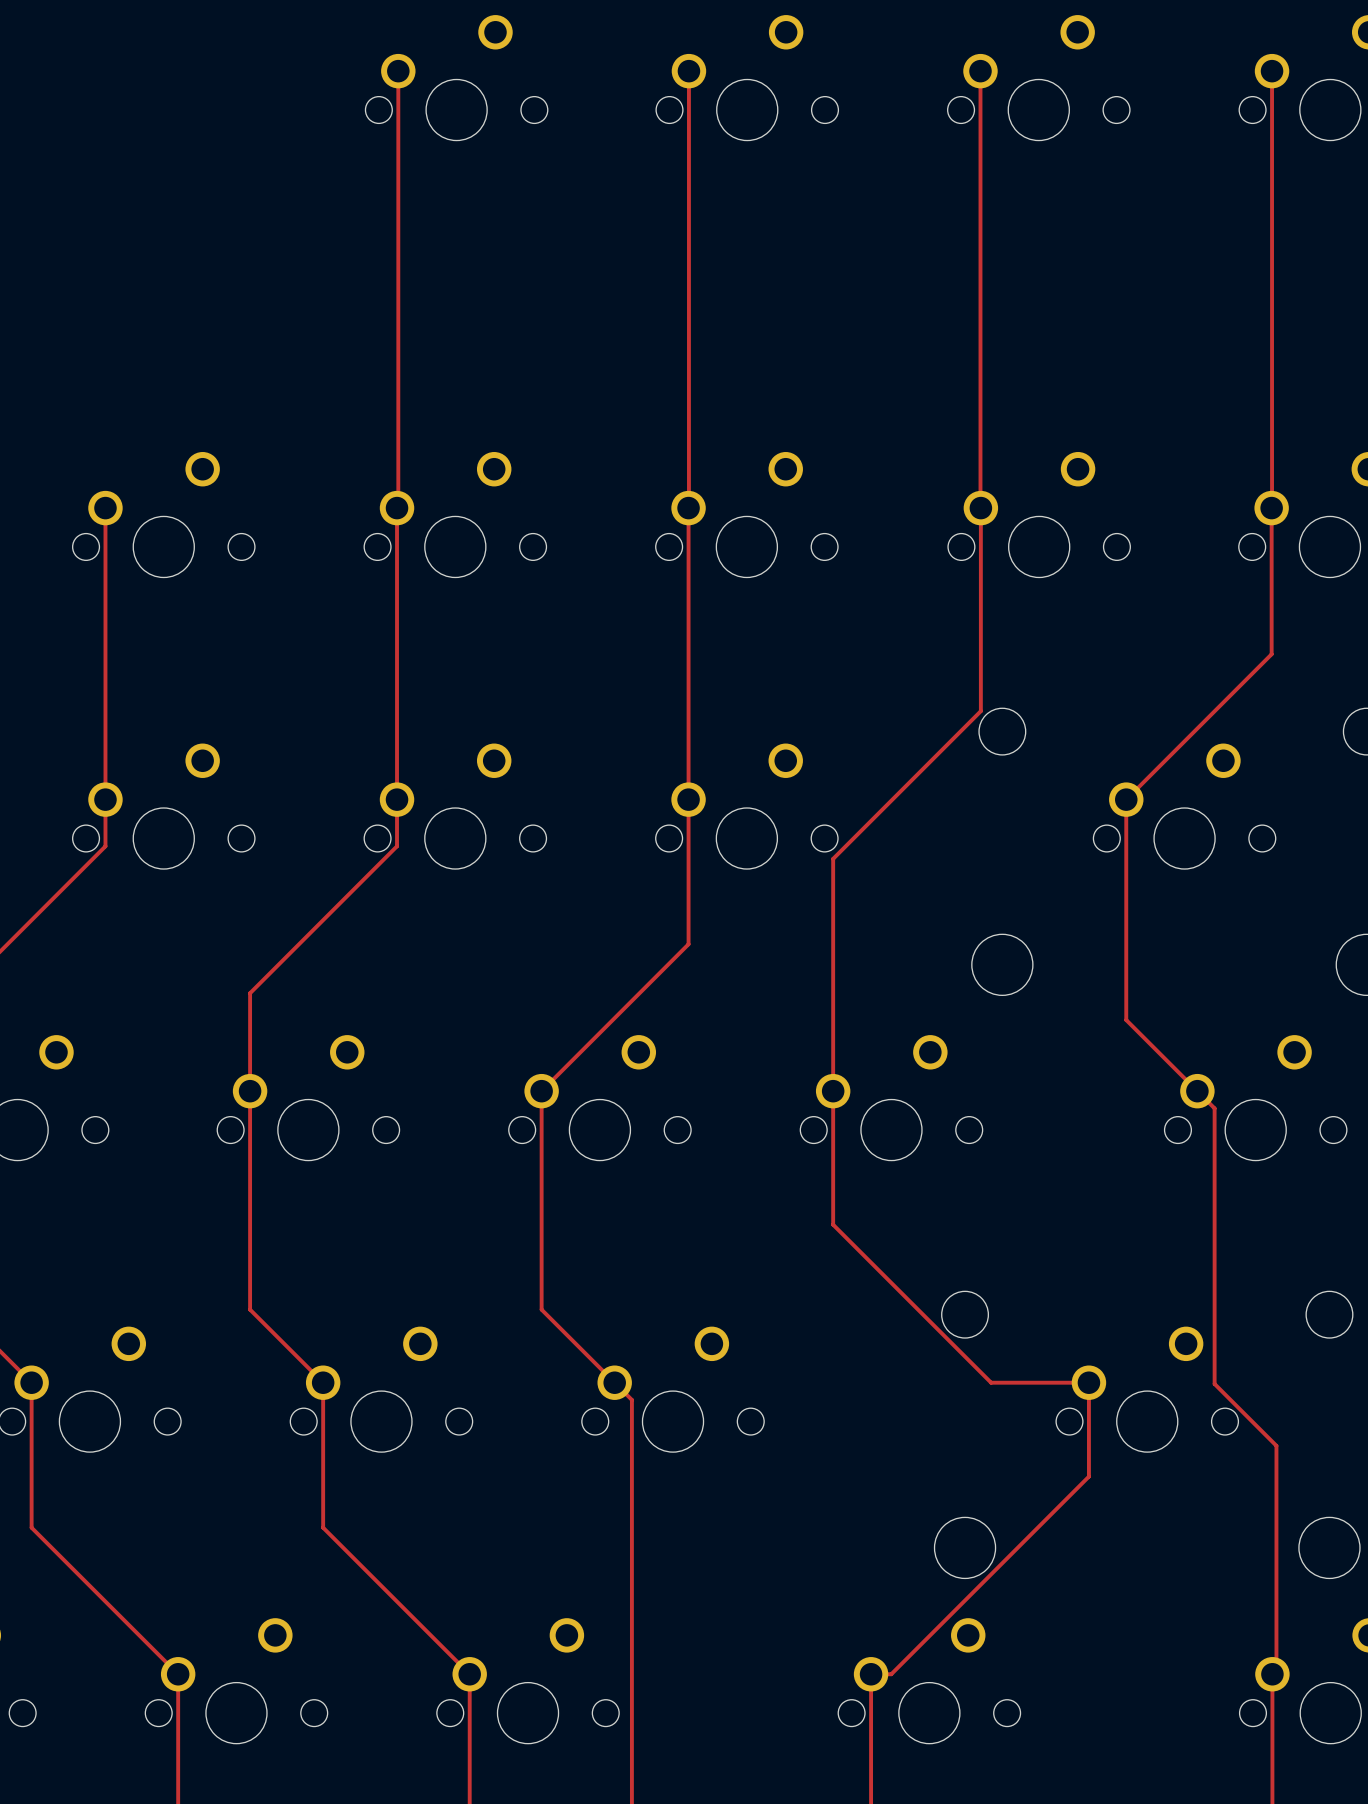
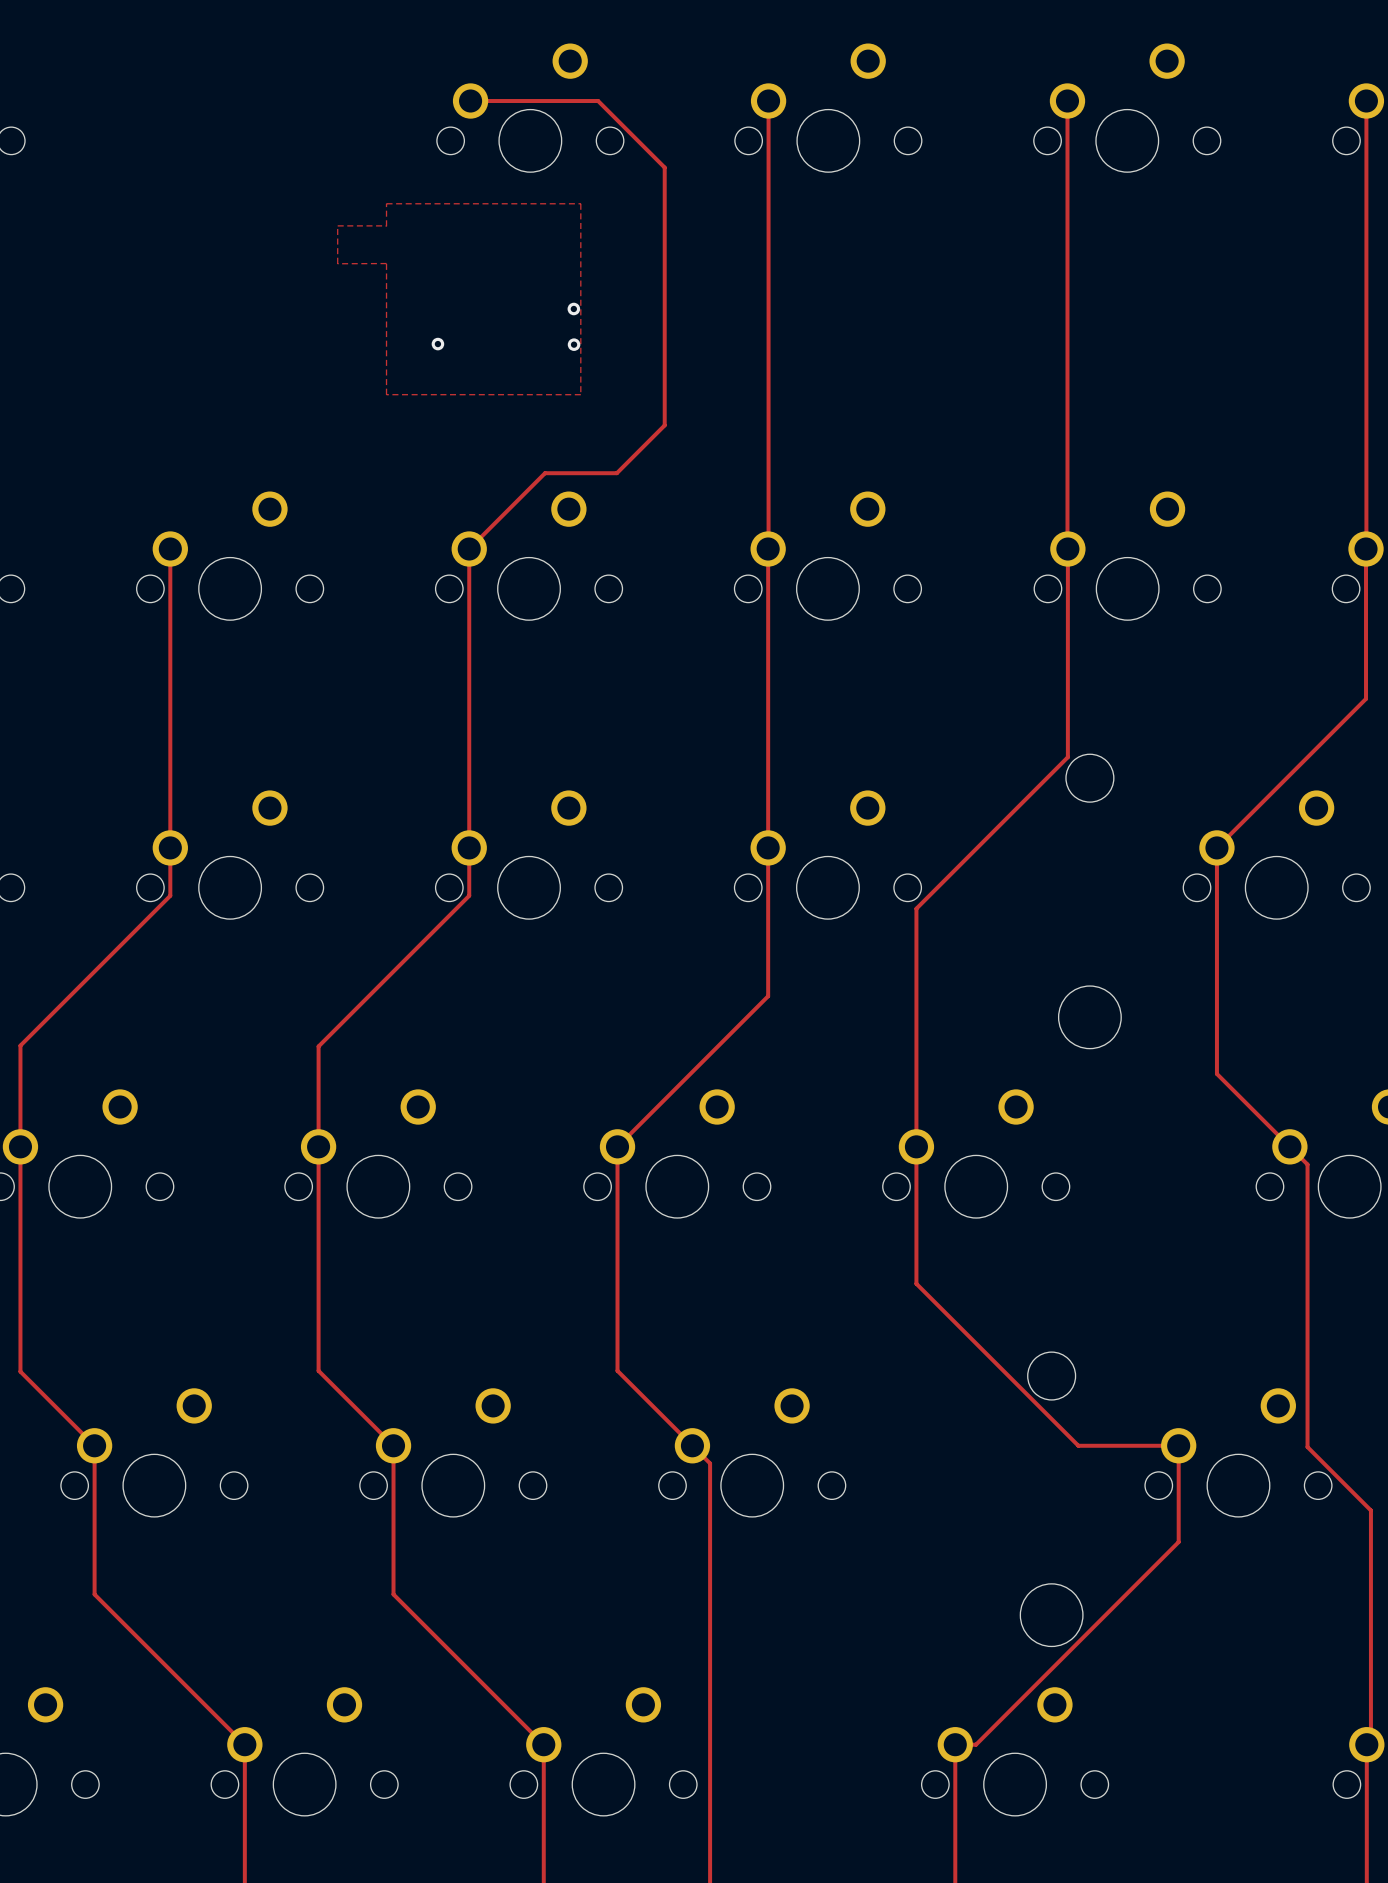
track: (398, 71) (398, 506) -> (470, 101) (598, 101) (664, 167) (664, 425) (616, 473) (545, 473) (470, 547)
zone outline: none -> (386, 203) (386, 226) (337, 225) (337, 263) (386, 263) (386, 394) (580, 394) (580, 203) (386, 203)
via: none -> (573, 308)
via: none -> (437, 344)
via: none -> (574, 344)

